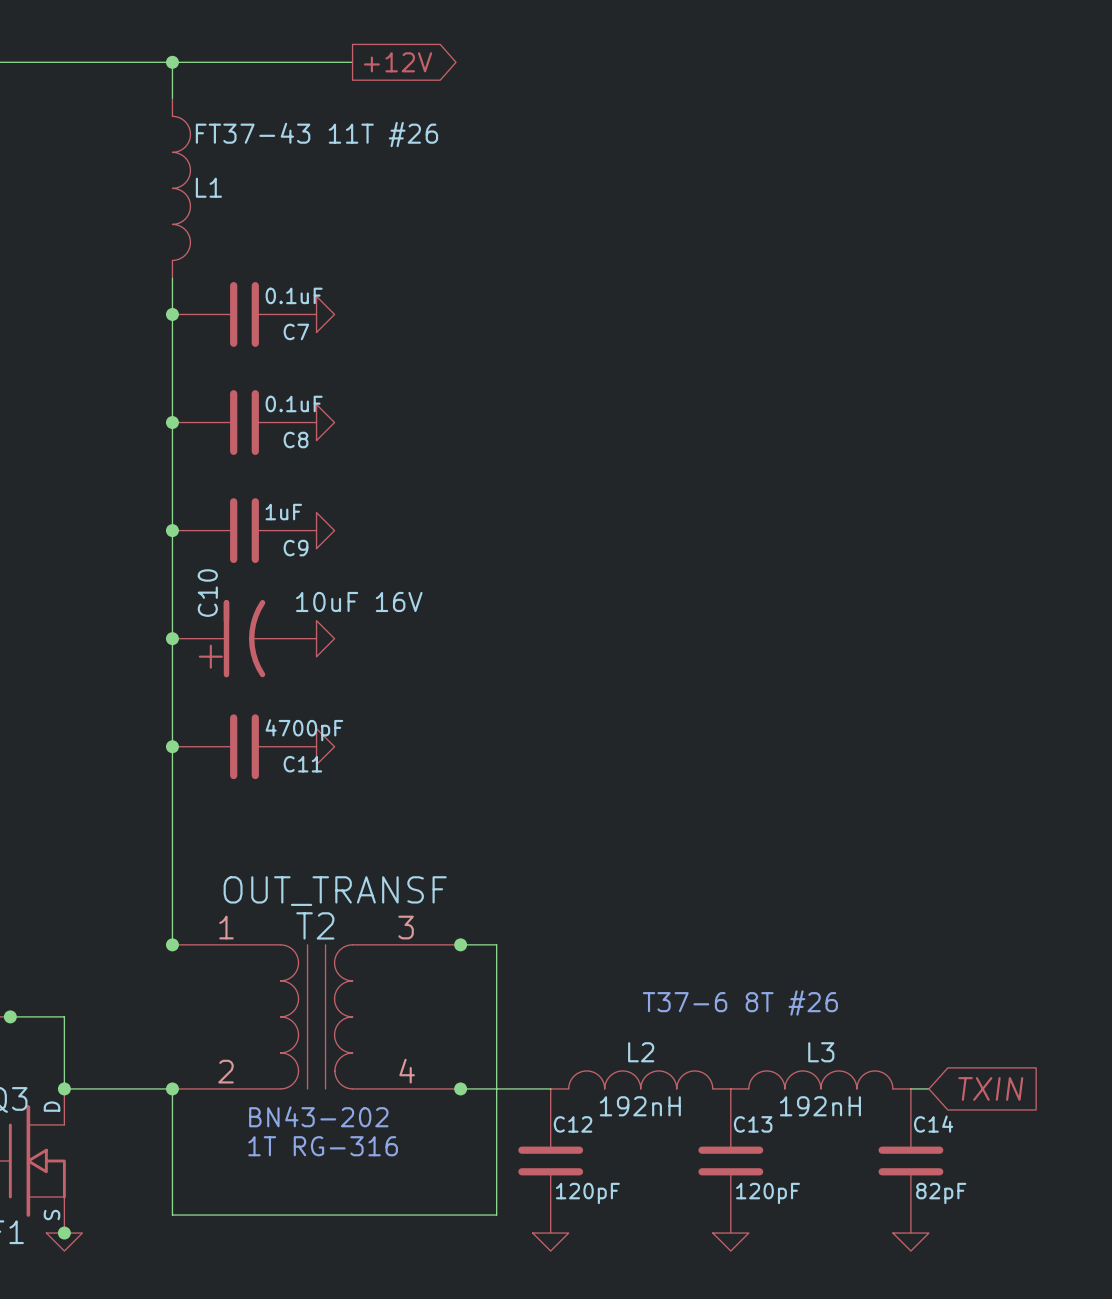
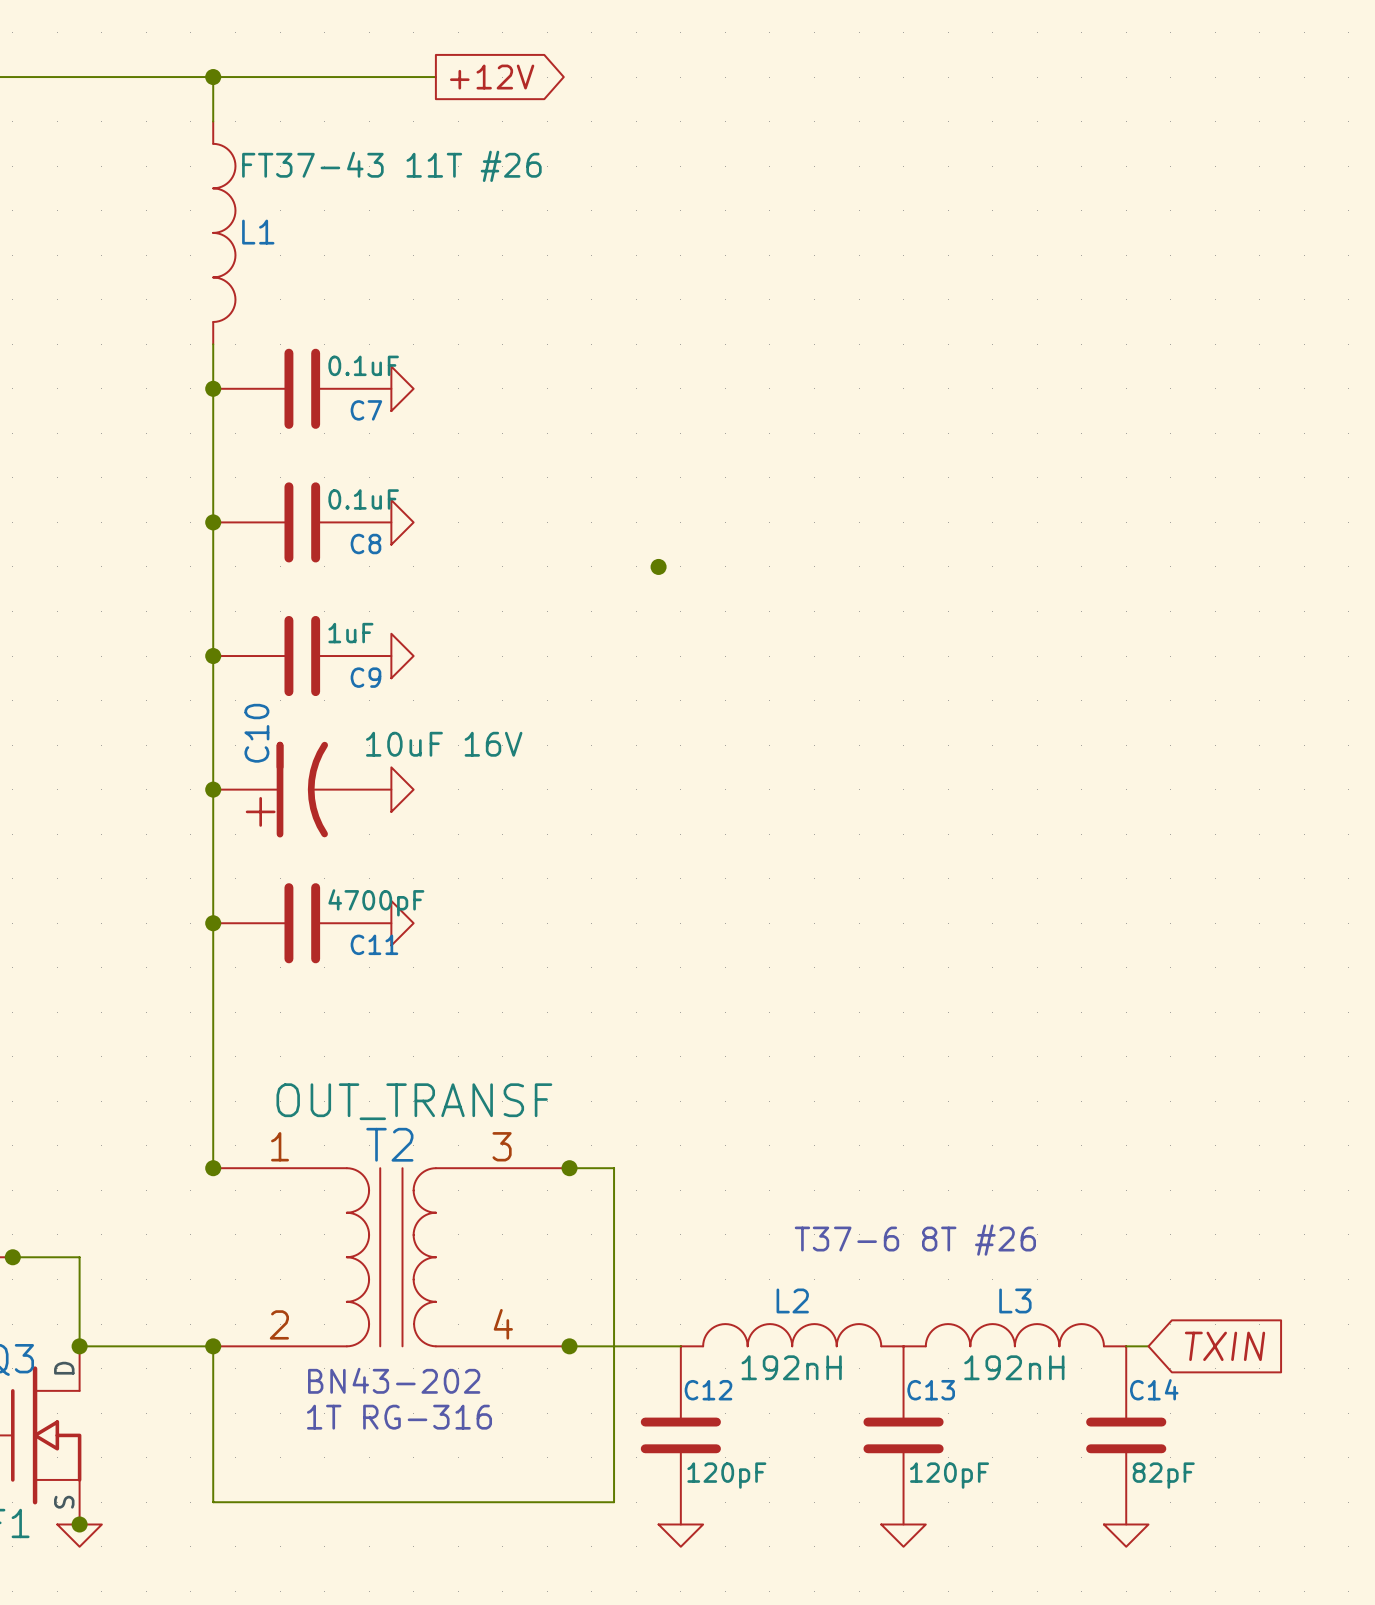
junction: none -> (658, 566)

